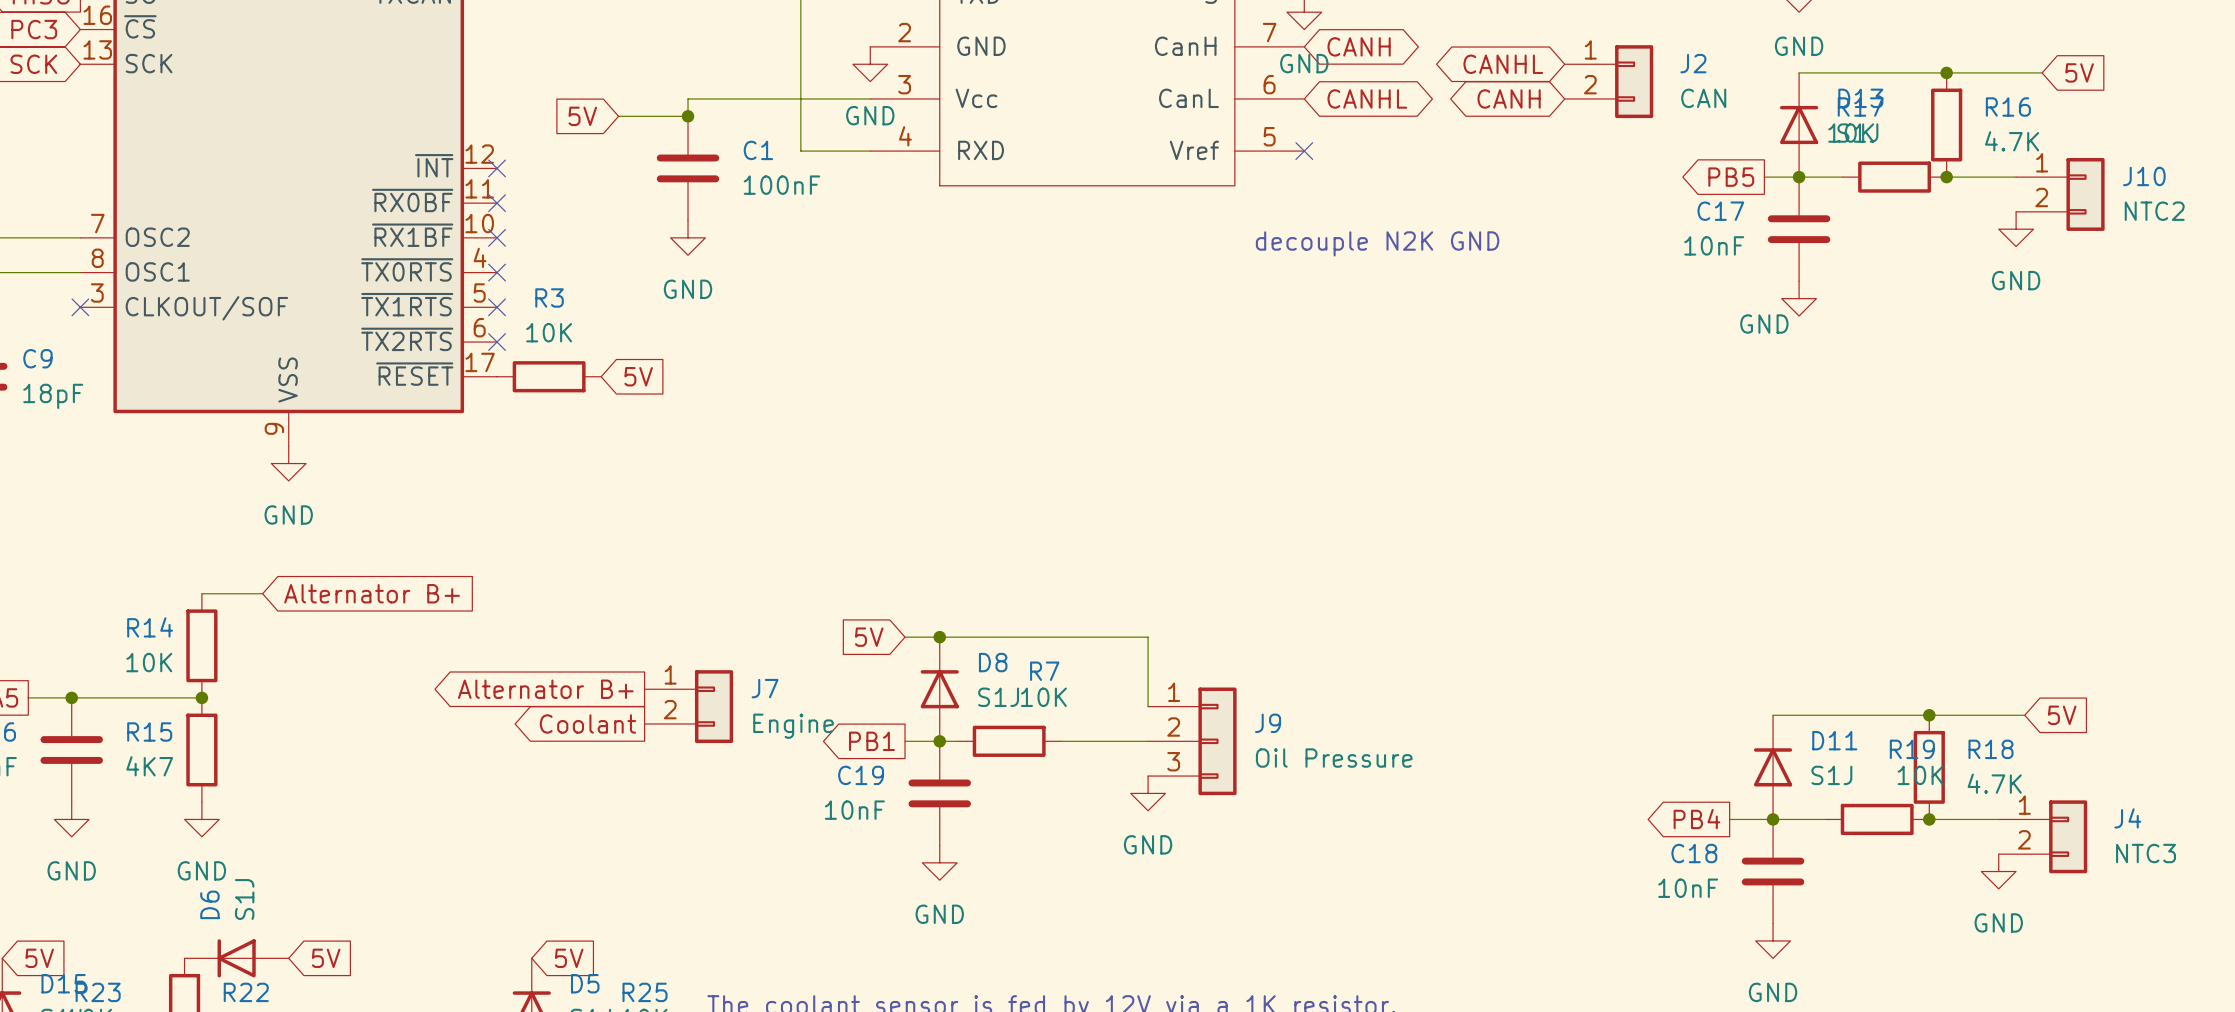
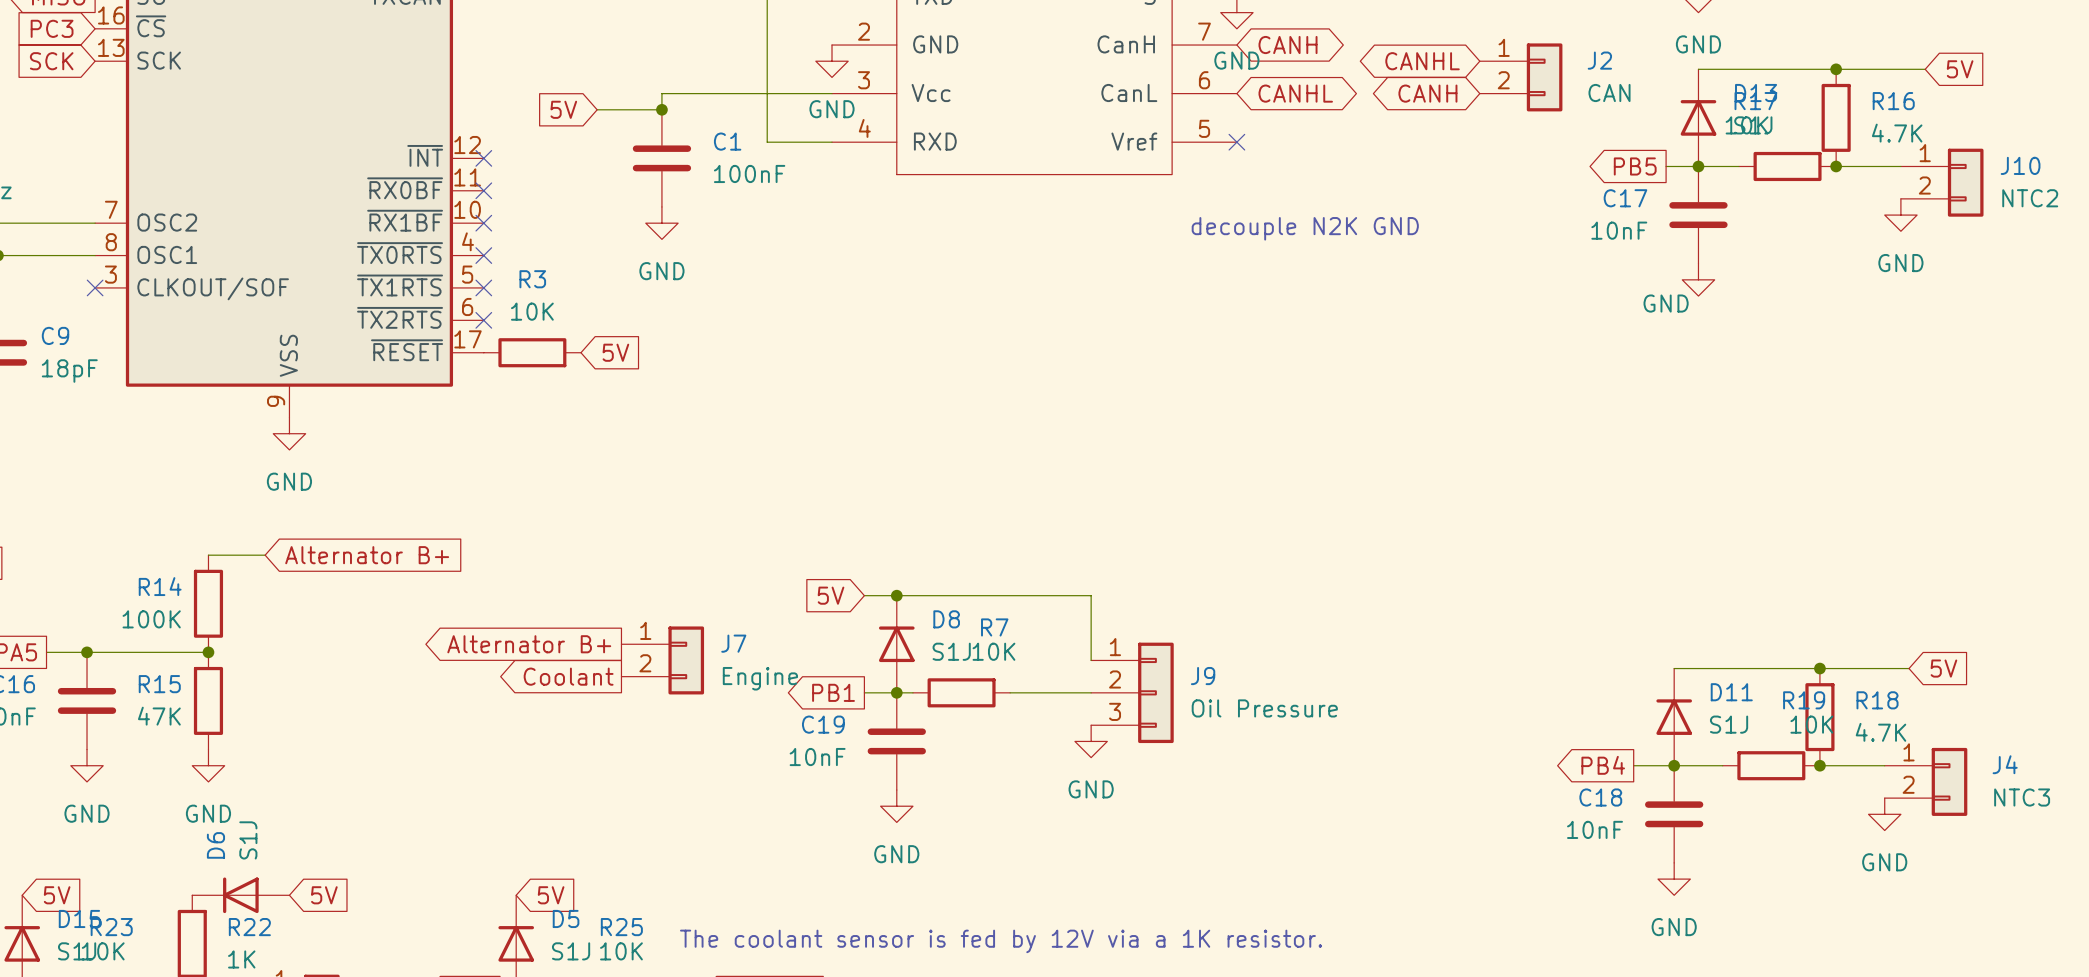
R14 value: 10K (149, 662) -> 100K (151, 619)
R15 value: 4K7 (149, 766) -> 47K (159, 716)

